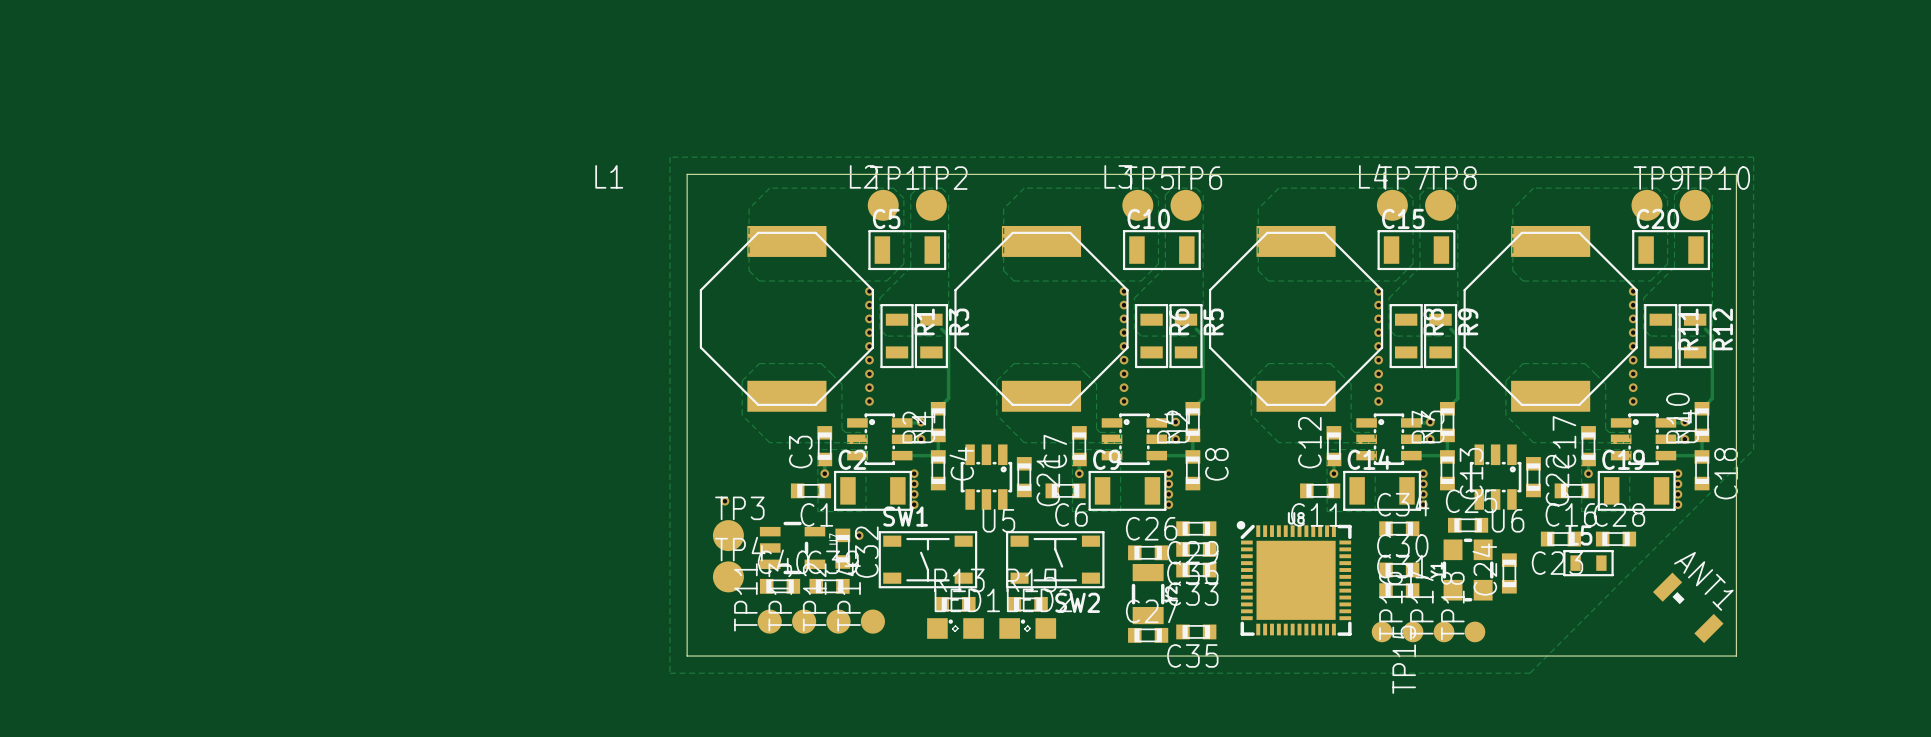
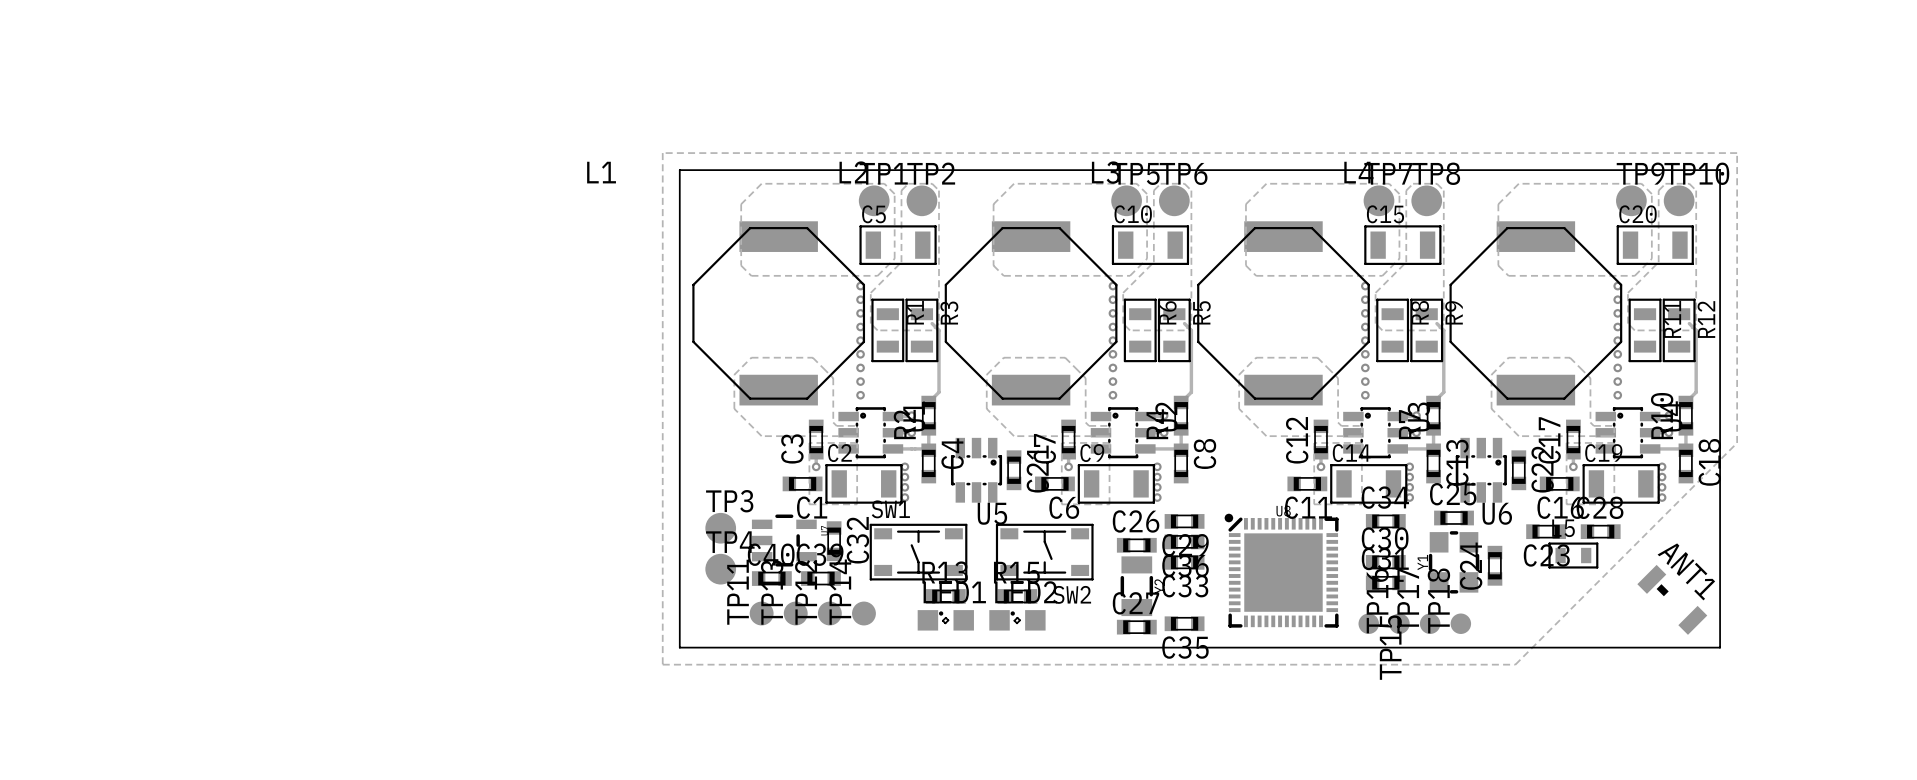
via: (724, 501) -> none
via: (859, 535) -> none

